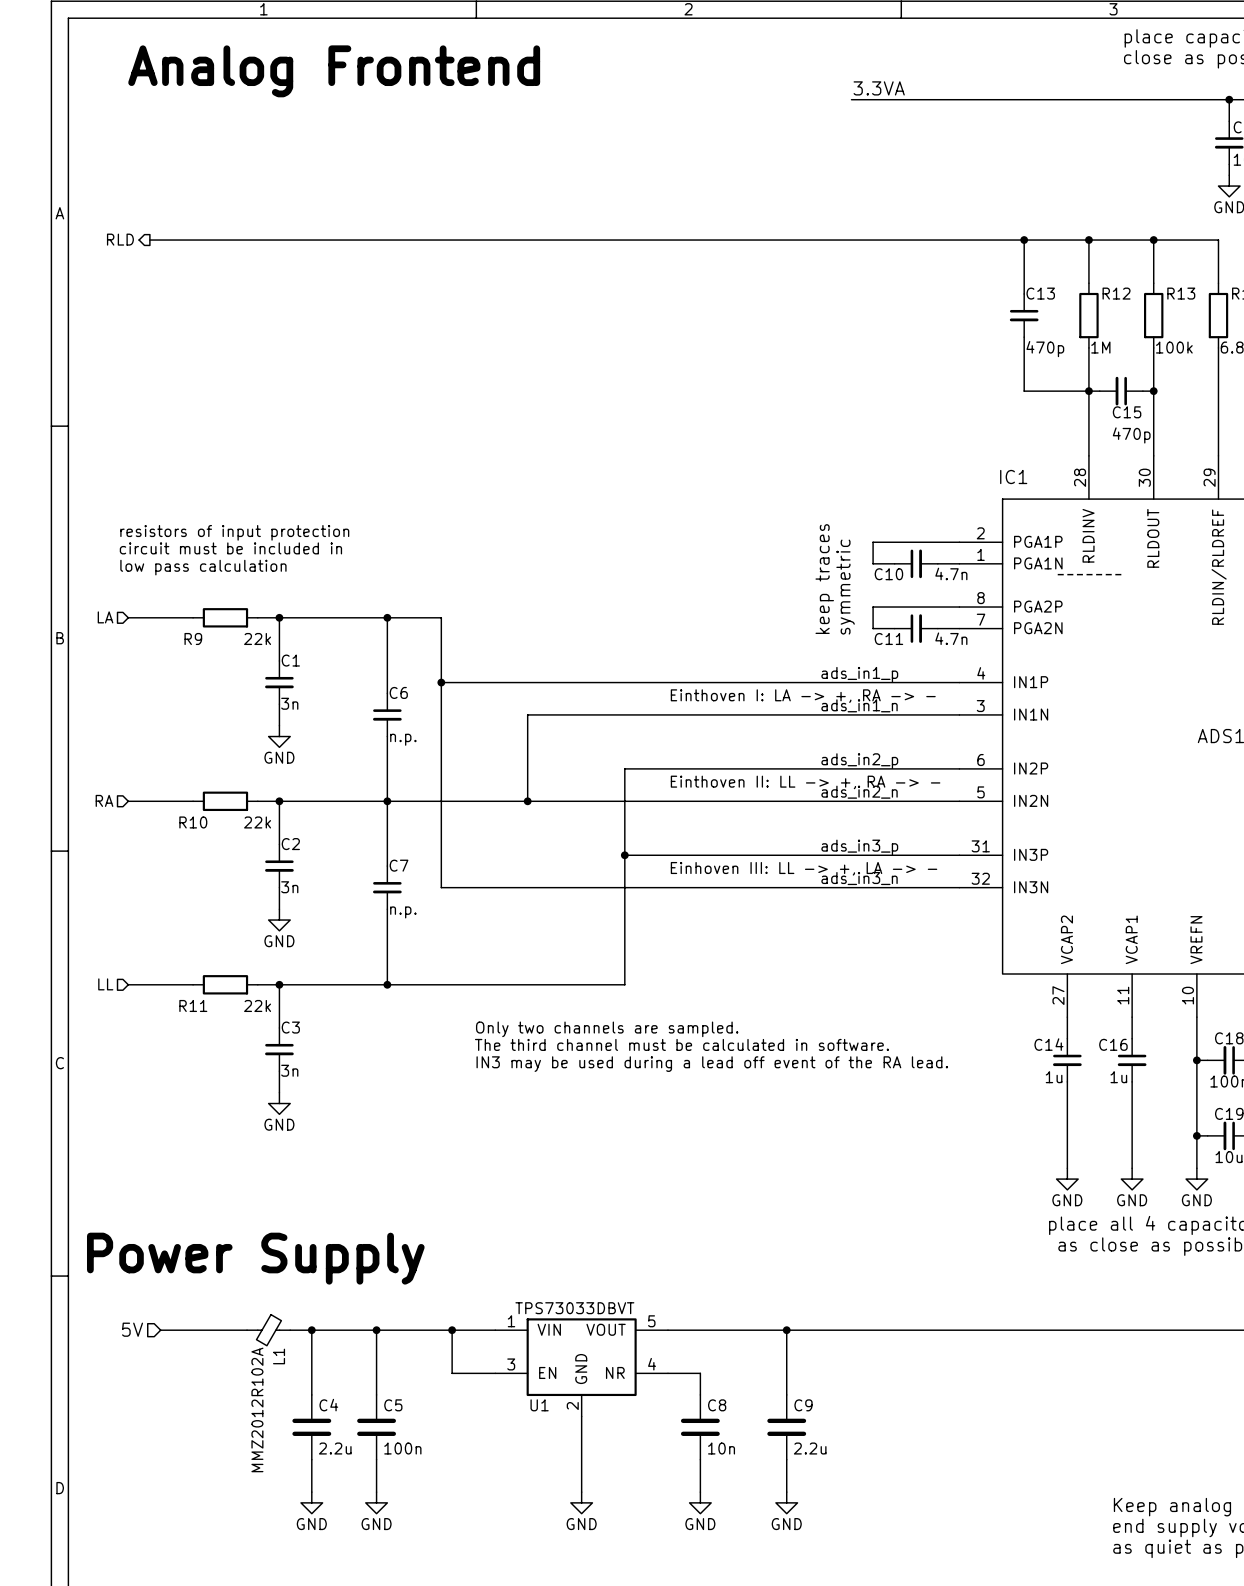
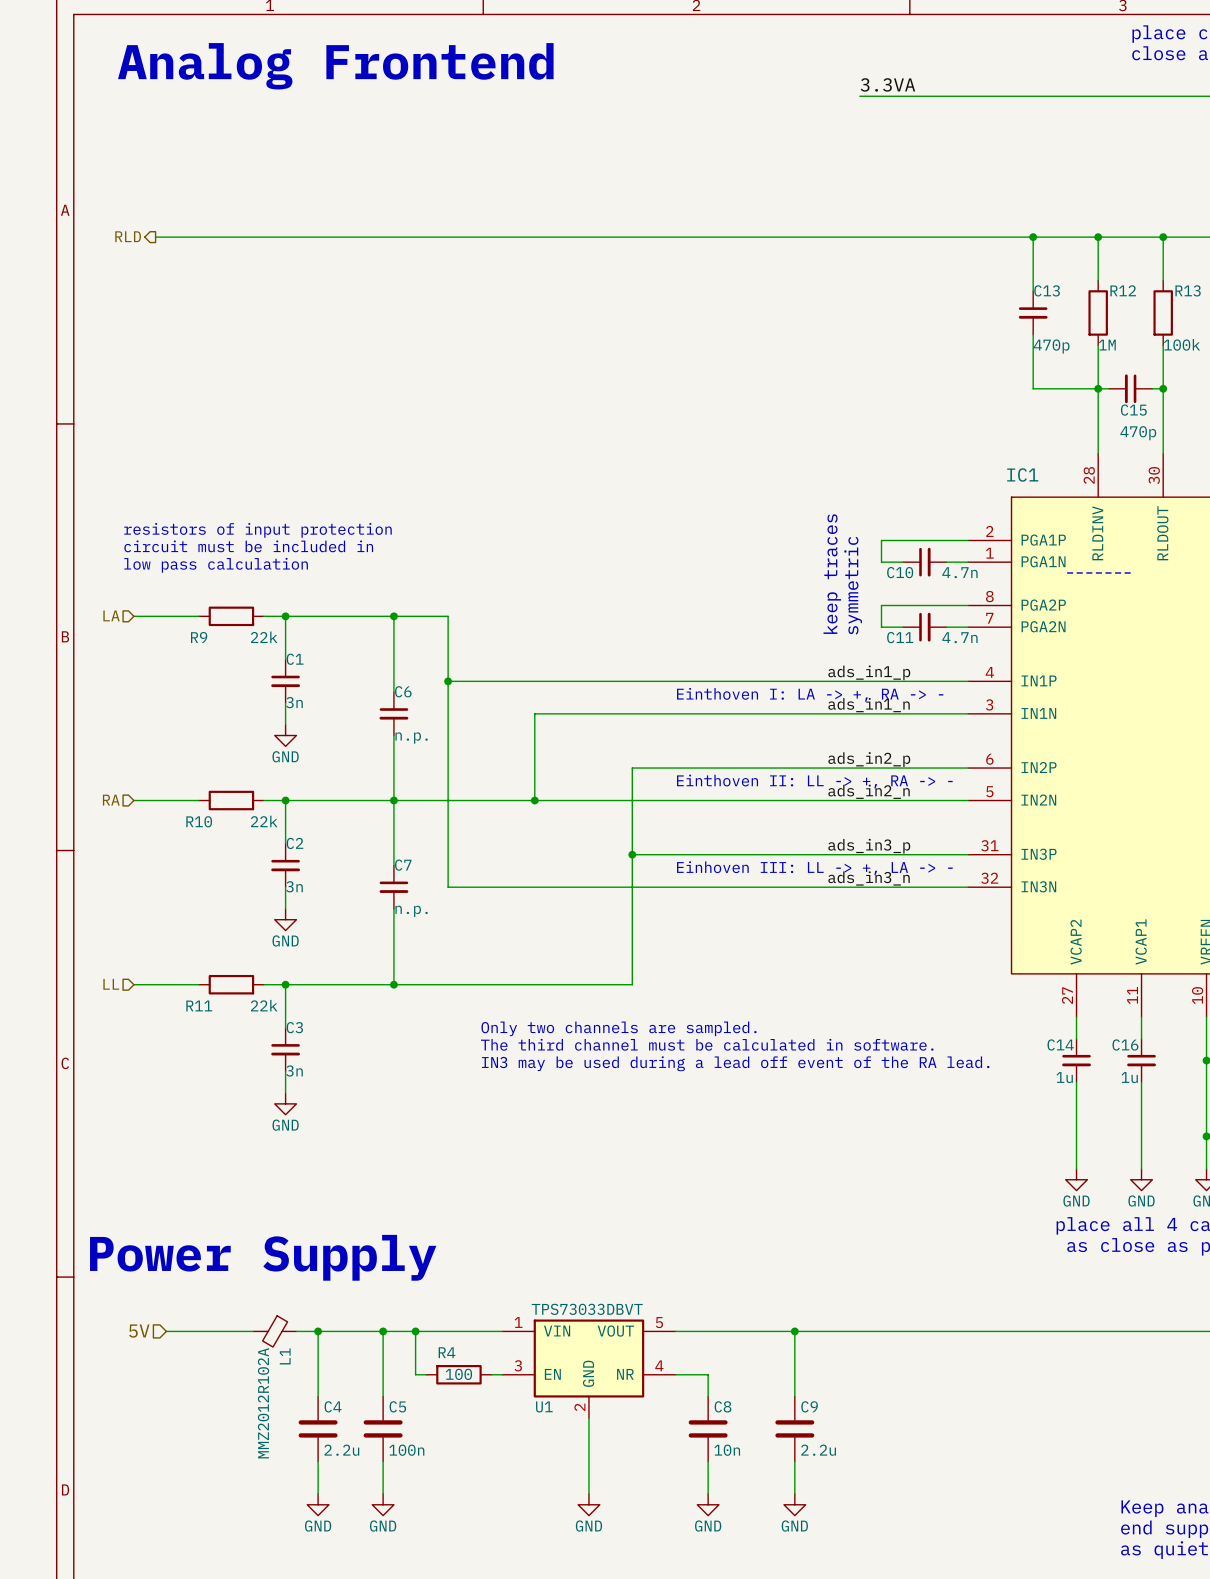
wire: none -> (415, 1331) (415, 1374) (426, 1374)
wire: (452, 1330) (452, 1373) (484, 1373) -> none
junction position: (452, 1330) -> (415, 1331)
R4: none -> 100 (458, 1374)

